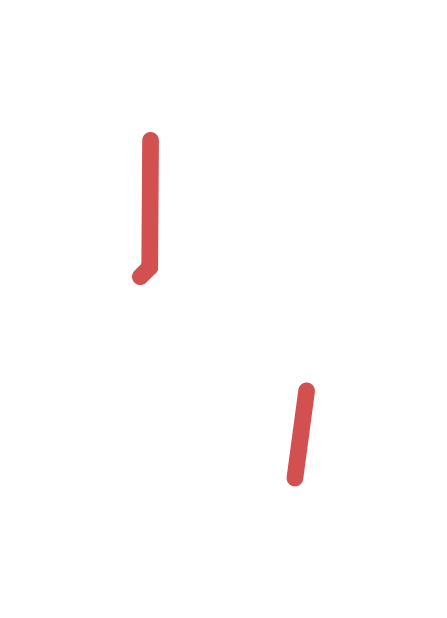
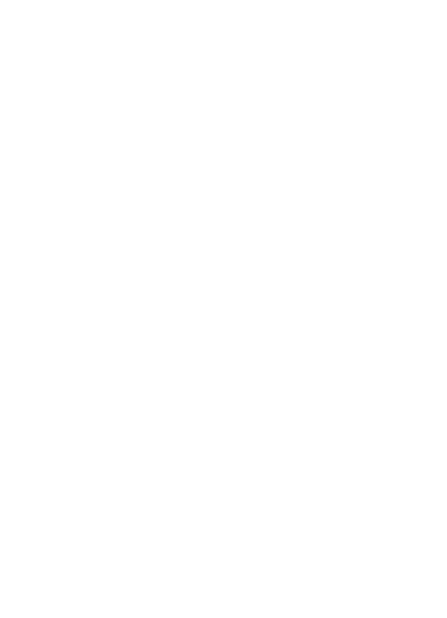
top track: (150, 140) (149, 267) (140, 276) -> none
top track: (306, 390) (294, 478) -> none

